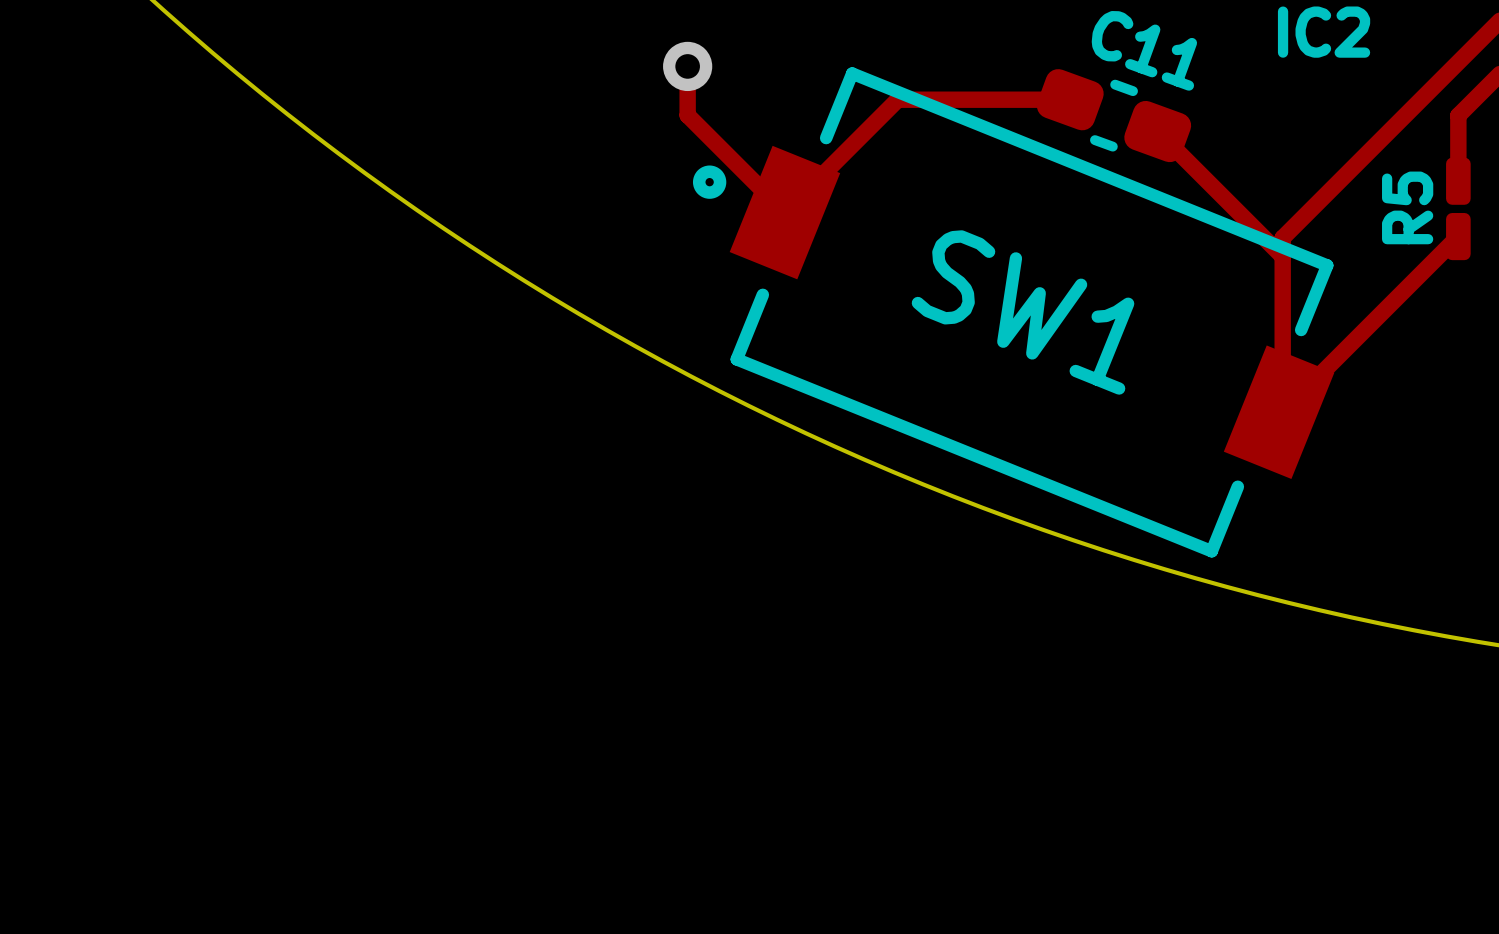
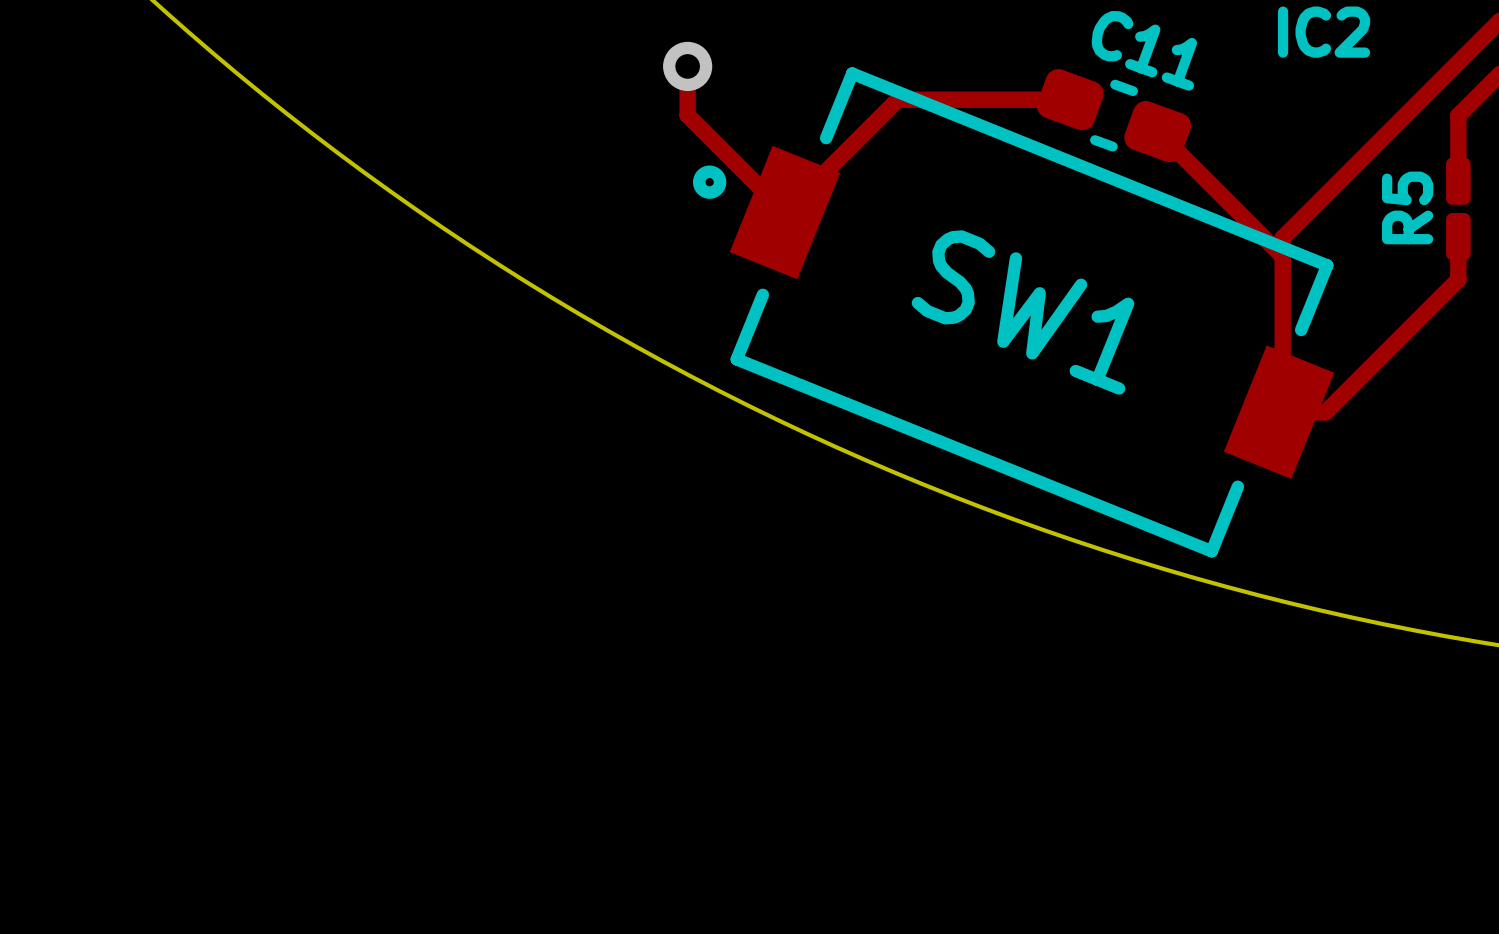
top track: (1458, 236) (1282, 412) -> (1458, 236) (1458, 279) (1325, 412) (1282, 412)

